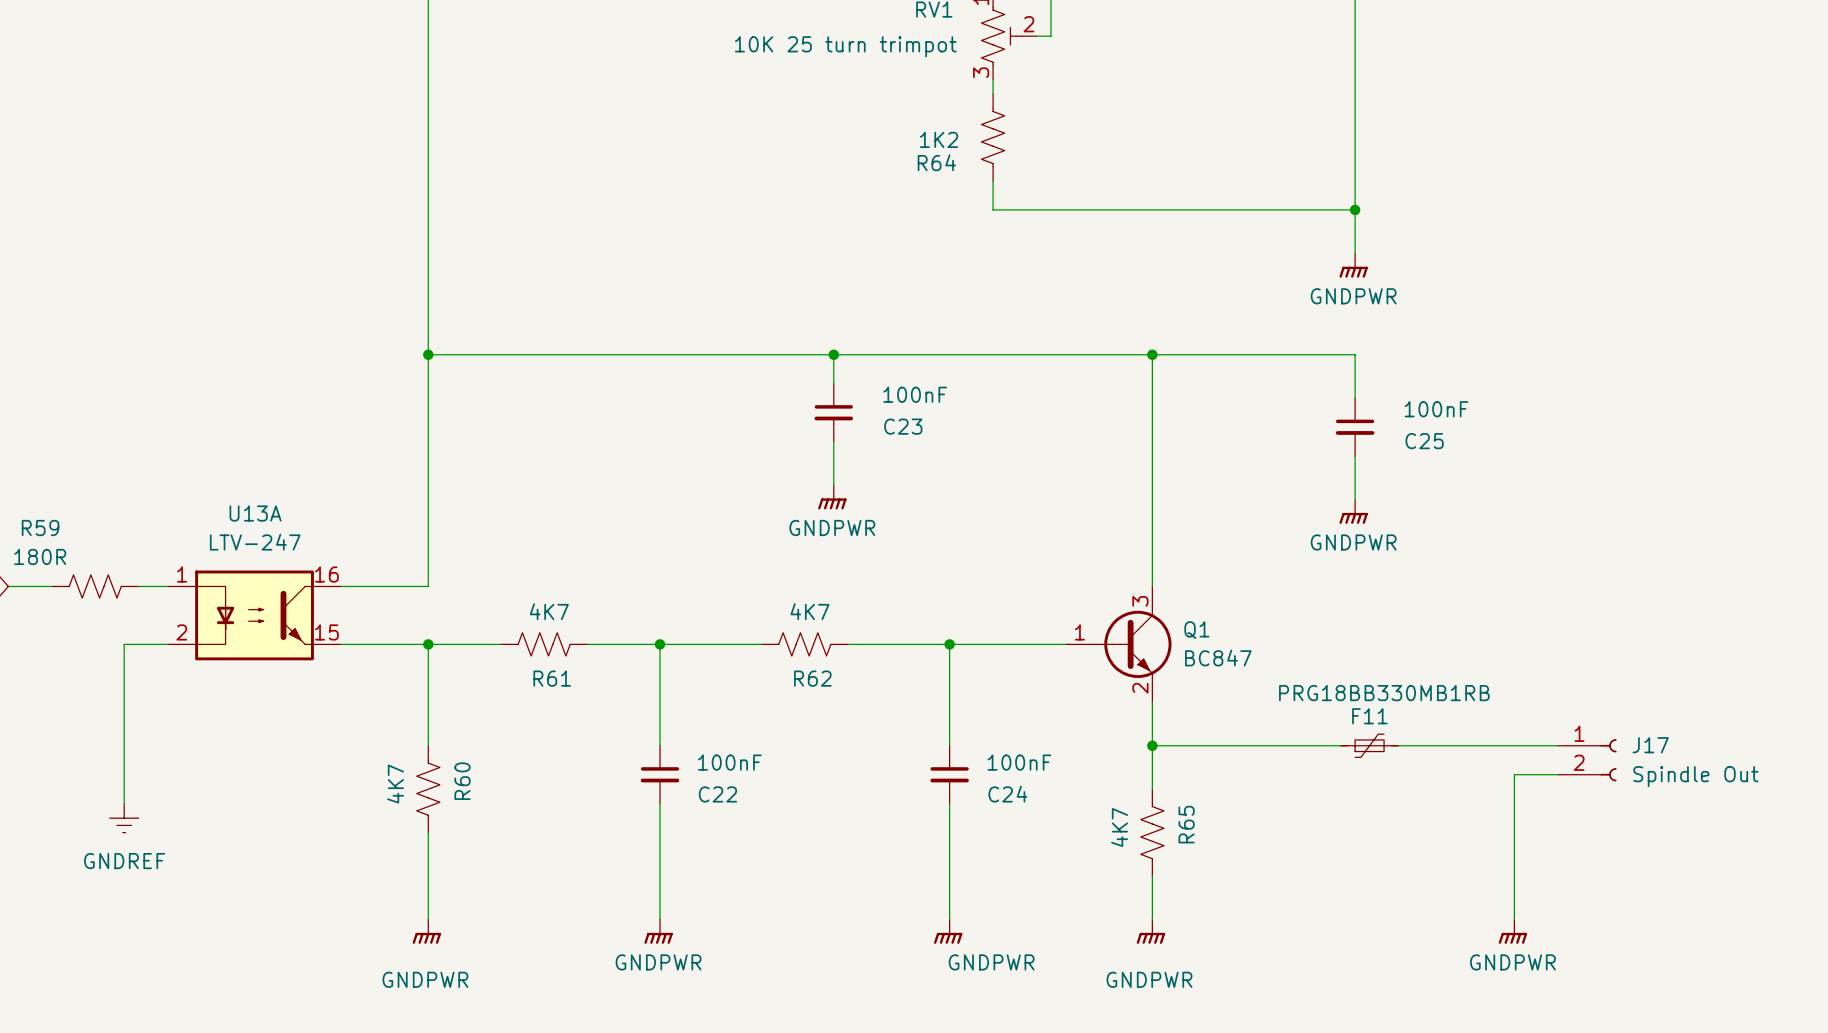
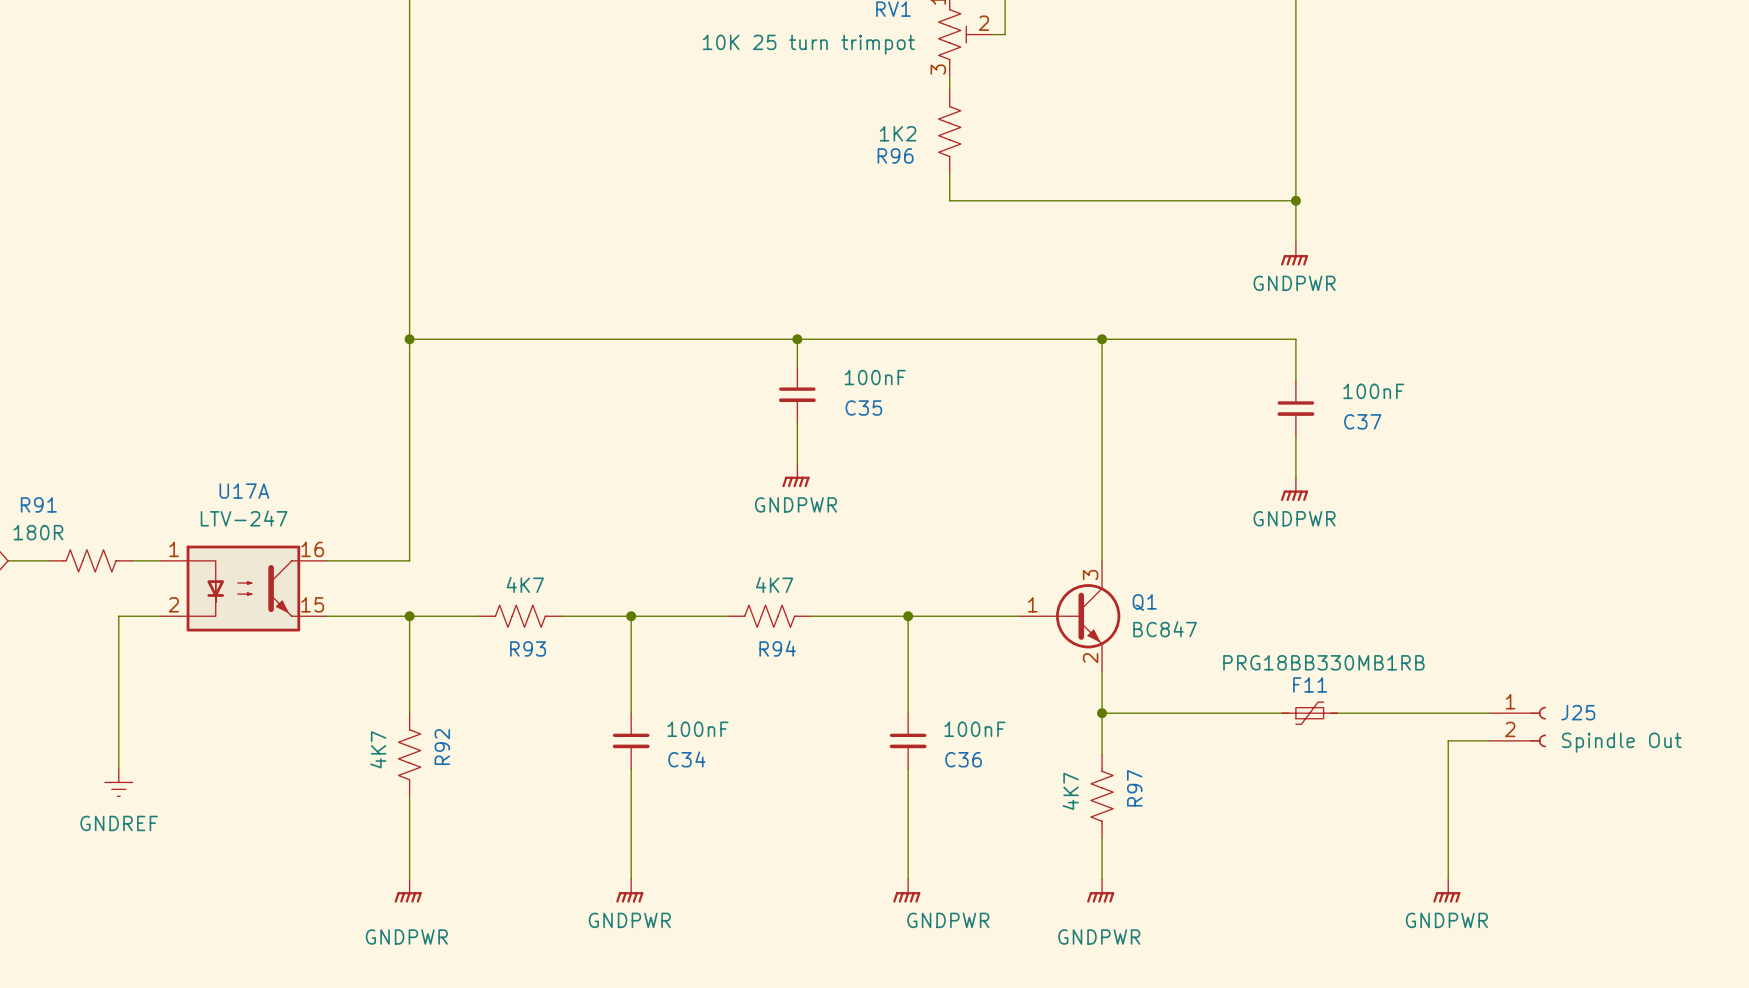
R64 name: R64 (936, 162) -> R96 (895, 155)
C23 name: C23 (903, 426) -> C35 (863, 408)
C25 name: C25 (1424, 441) -> C37 (1362, 421)
U13A name: U13A (255, 513) -> U17A (244, 491)
R59 name: R59 (40, 528) -> R91 (38, 504)
R61 name: R61 (552, 678) -> R93 (528, 648)
R62 name: R62 (812, 678) -> R94 (777, 648)
J17 name: J17 (1650, 745) -> J25 (1578, 712)
R60 name: R60 (462, 781) -> R92 (442, 747)
C22 name: C22 (717, 794) -> C34 (686, 759)
C24 name: C24 (1007, 794) -> C36 (963, 759)
R65 name: R65 (1186, 824) -> R97 (1134, 788)

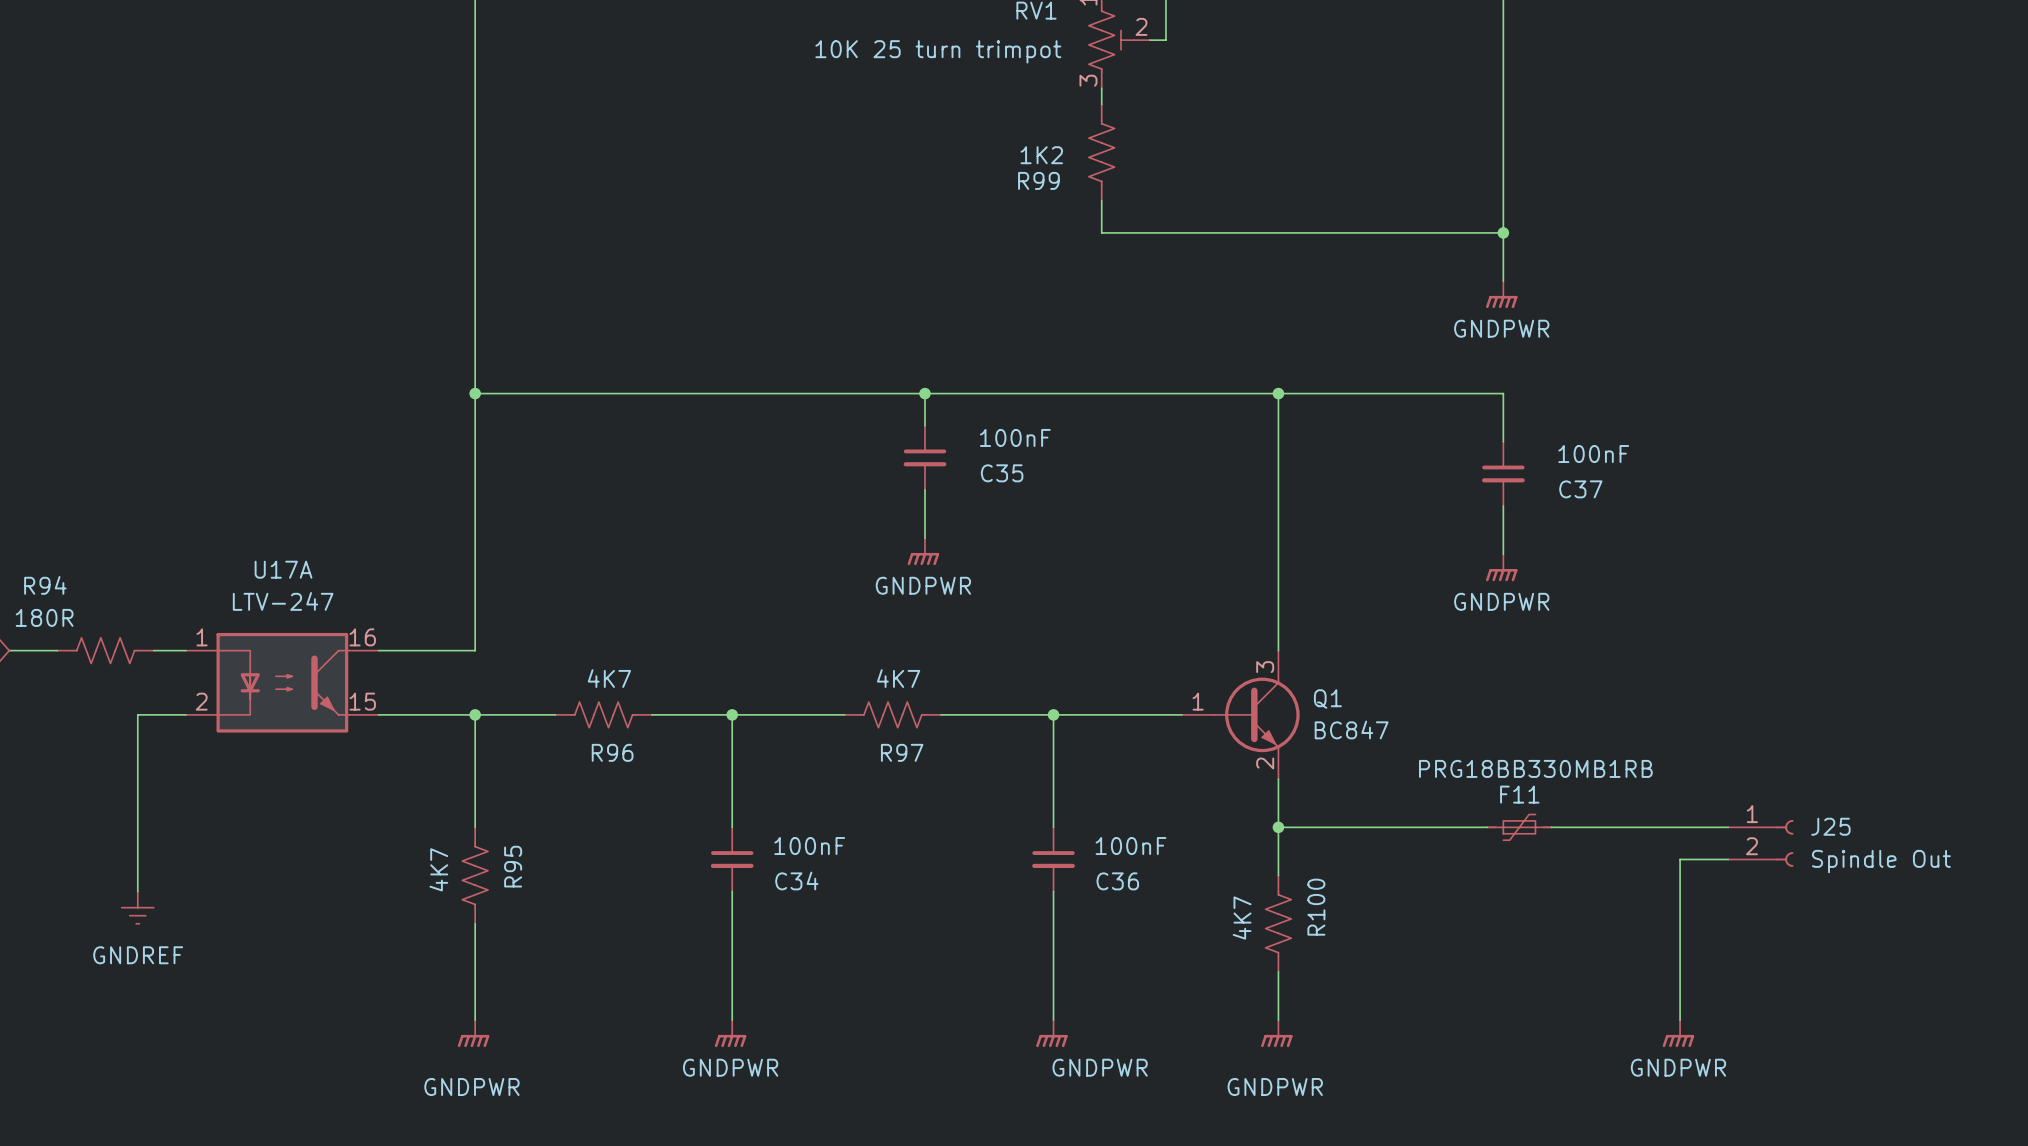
R96 name: R96 (895, 155) -> R99 (1038, 180)
R91 name: R91 (38, 504) -> R94 (45, 585)
R93 name: R93 (528, 648) -> R96 (612, 752)
R94 name: R94 (777, 648) -> R97 (902, 752)
R92 name: R92 (442, 747) -> R95 (513, 866)
R97 name: R97 (1134, 788) -> R100 (1316, 907)

